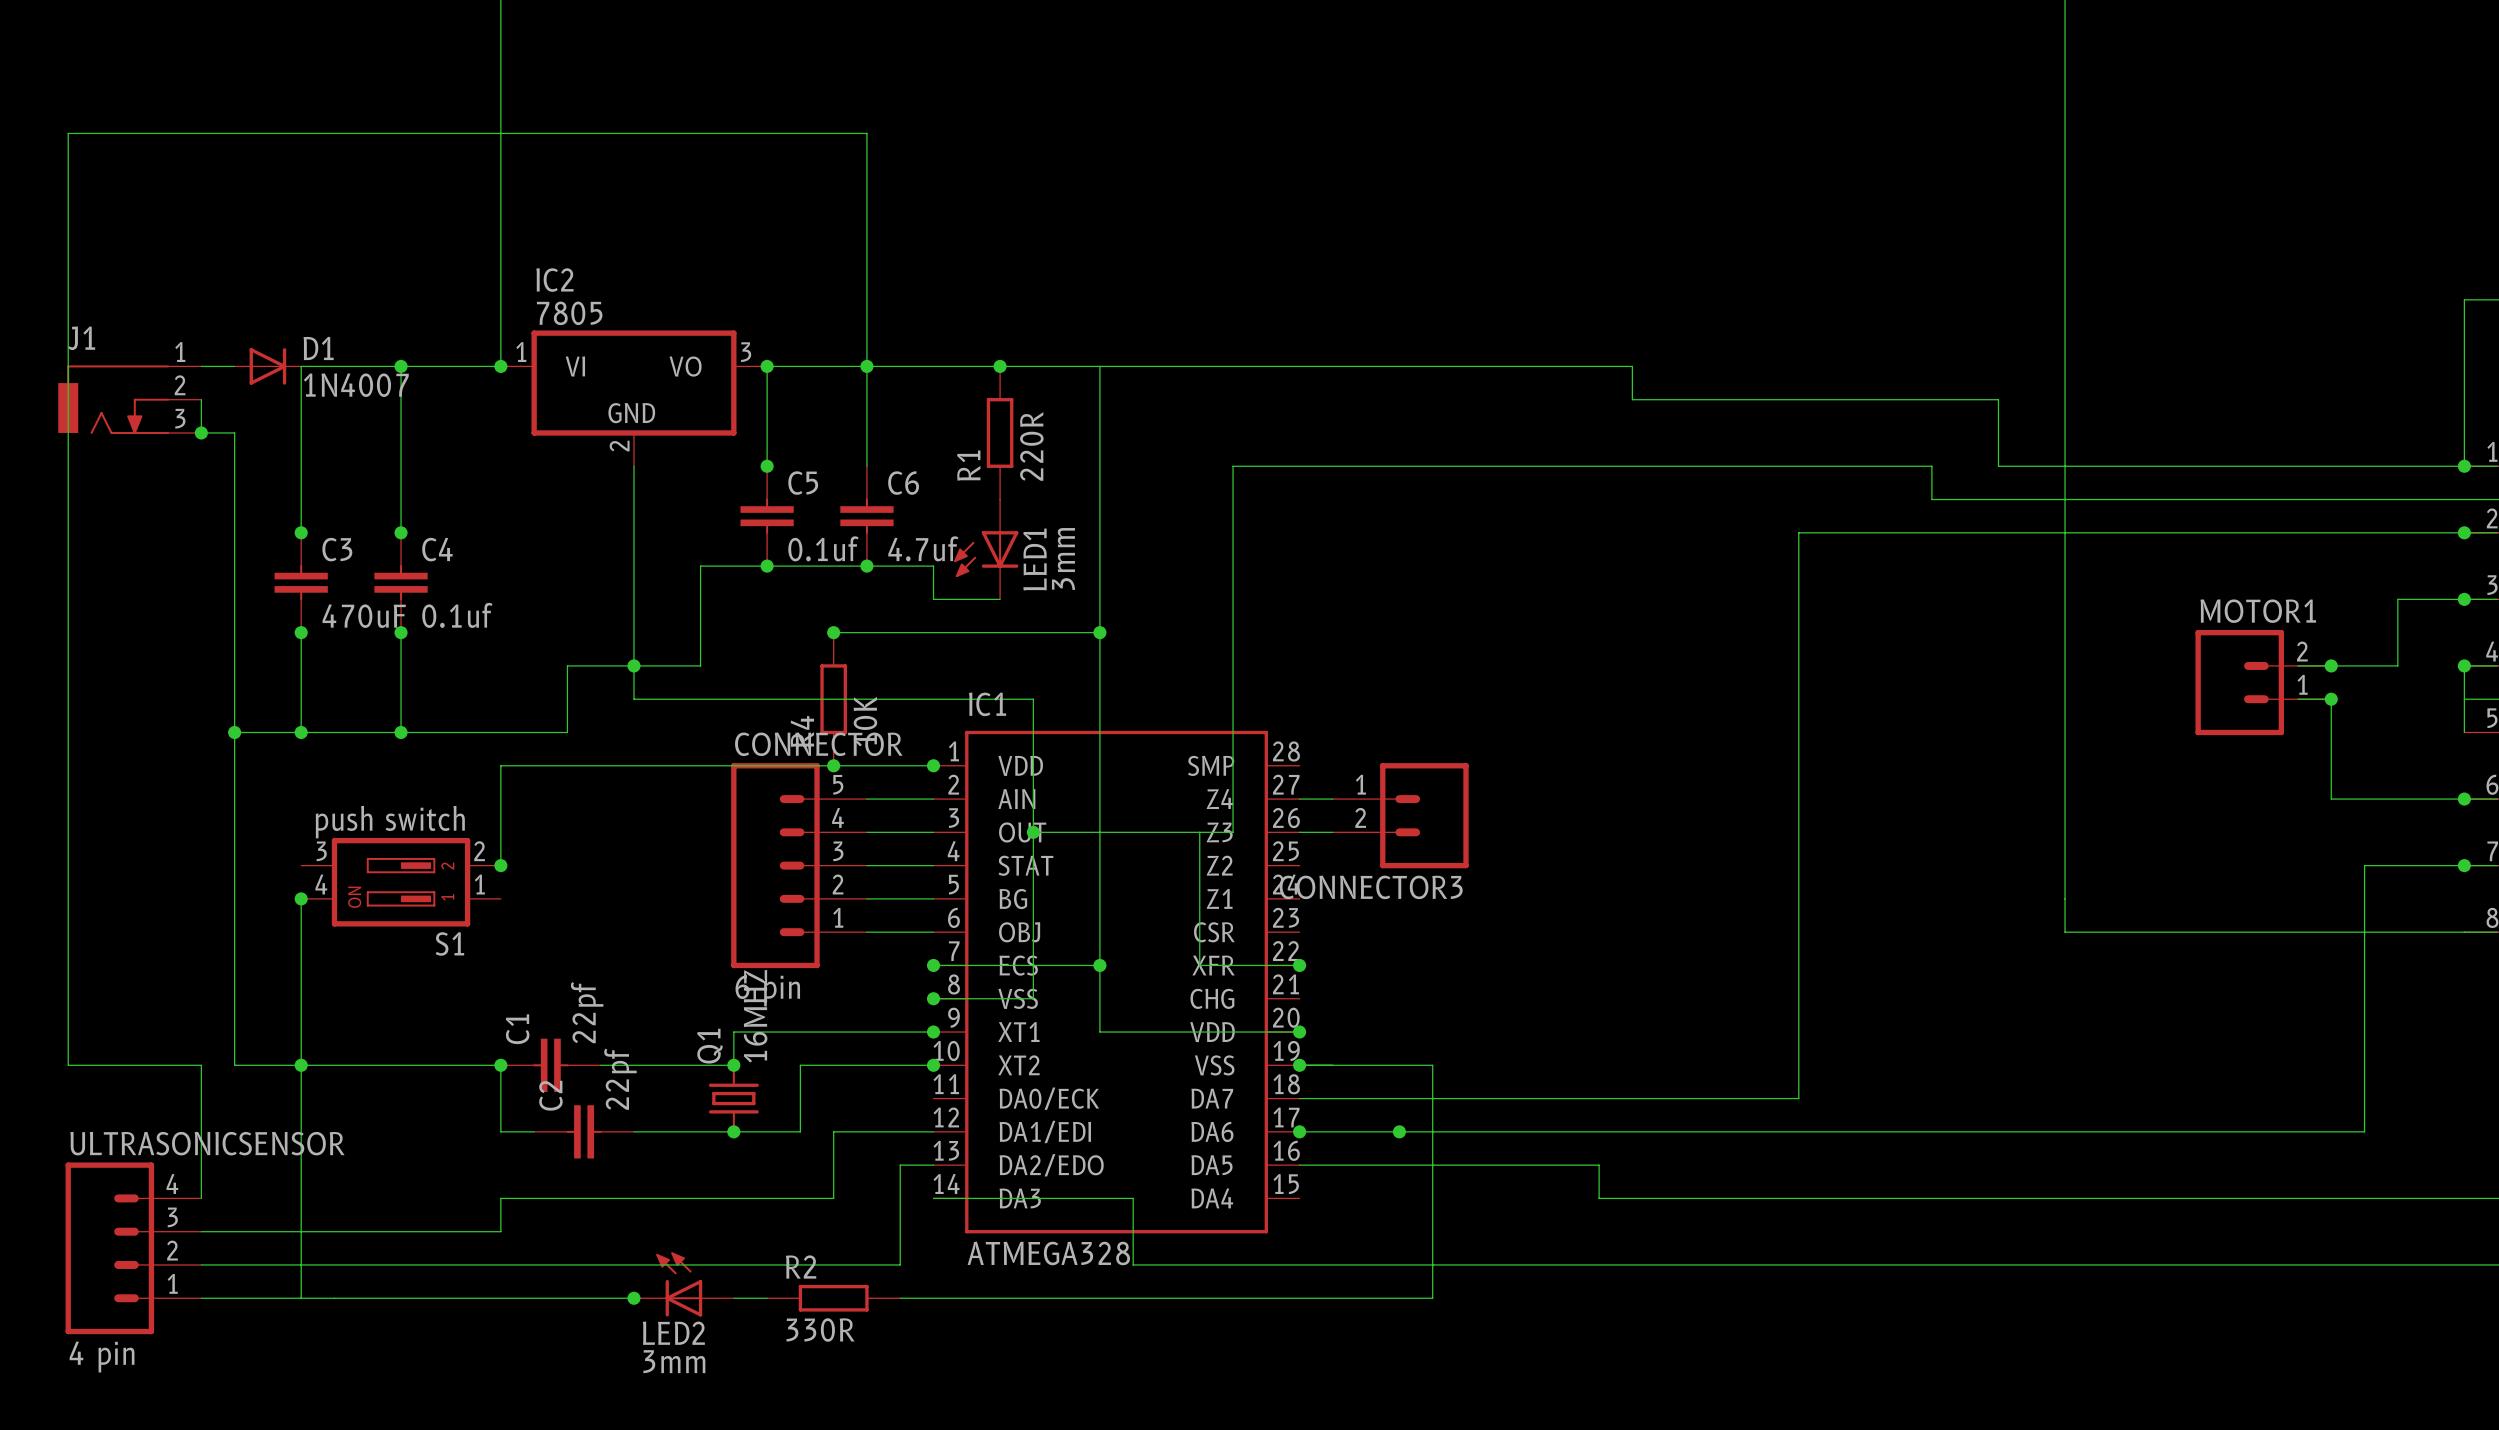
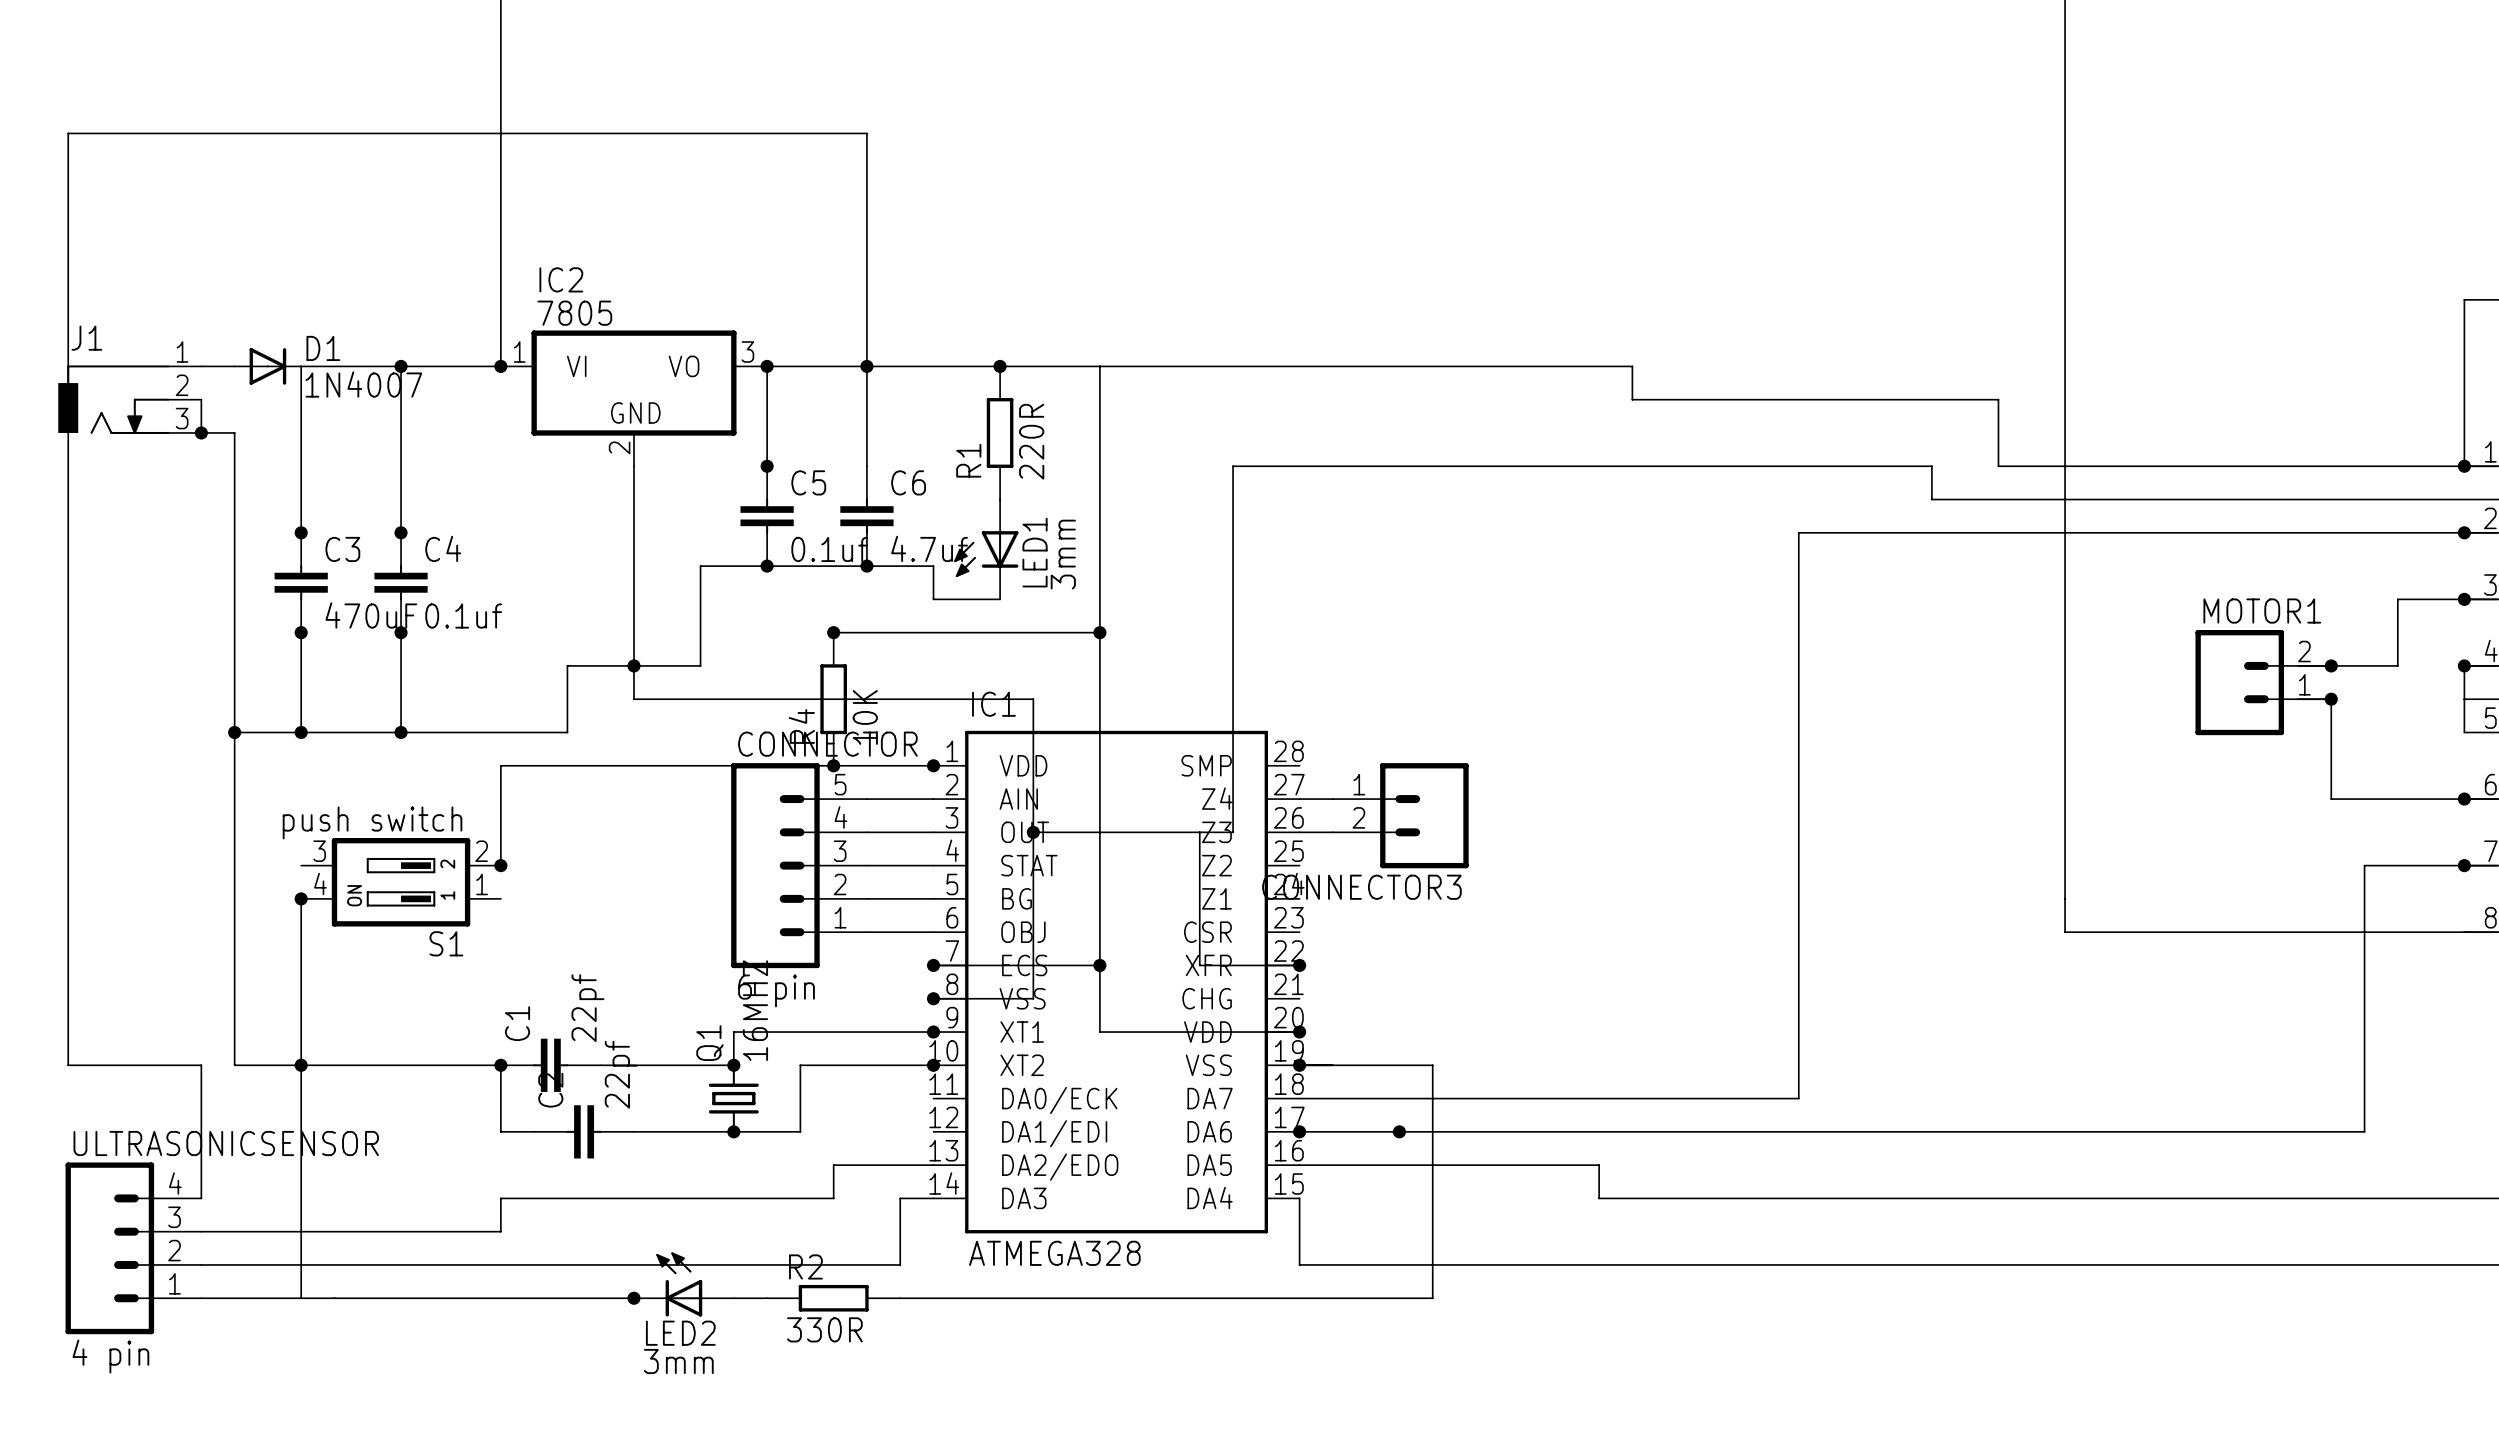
wire: (933, 1131) (833, 1131) (833, 1165) -> (900, 1165) (833, 1165)
wire: (900, 1165) (900, 1198) -> (933, 1198) (900, 1198)
wire: (933, 1198) (1133, 1198) (1133, 1264) (1299, 1264) -> (1299, 1198) (1299, 1264)

